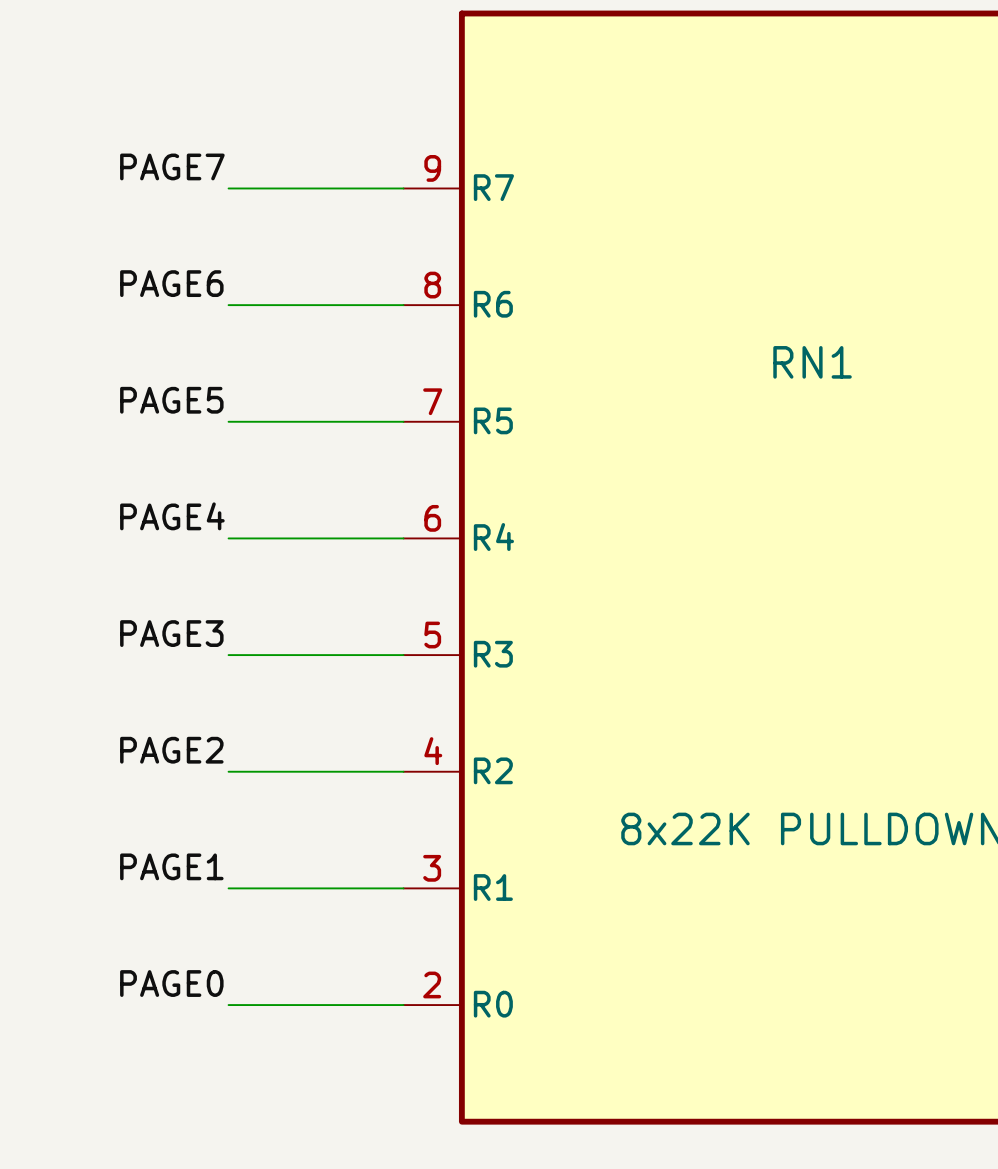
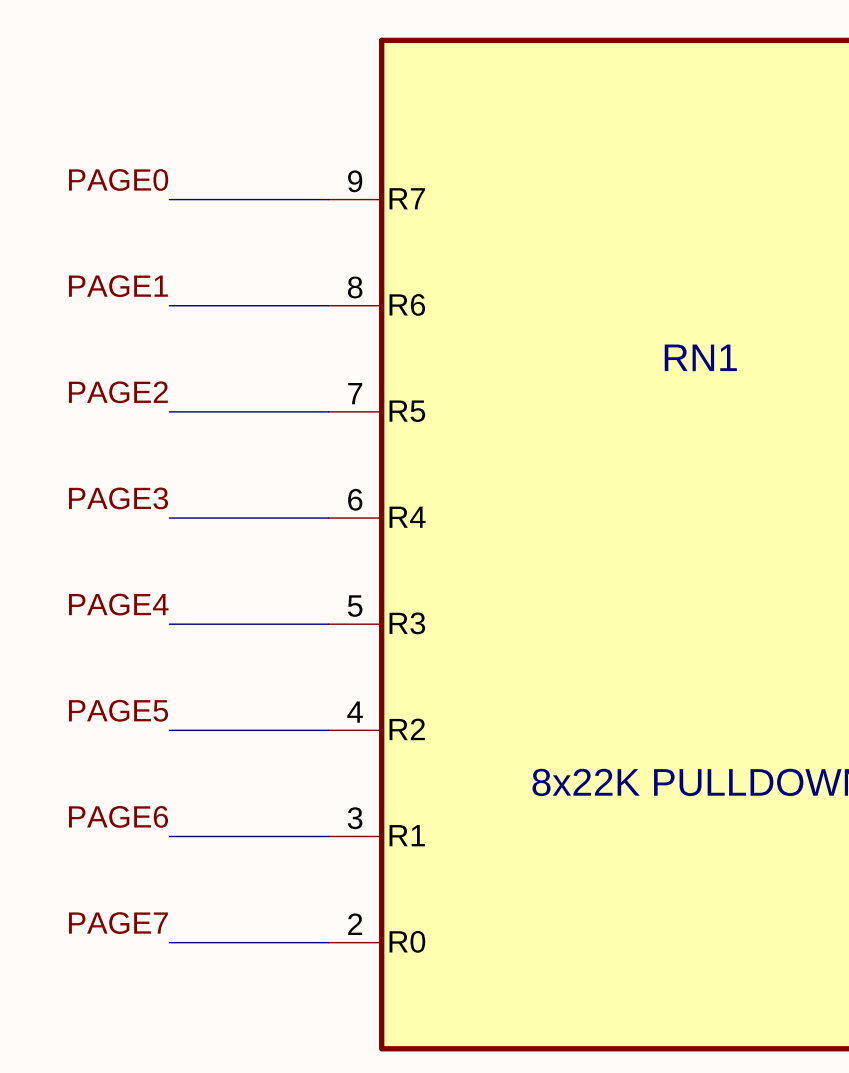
label: PAGE7 (172, 166) -> PAGE0 (118, 179)
label: PAGE6 (171, 283) -> PAGE1 (118, 286)
label: PAGE5 (171, 400) -> PAGE2 (118, 392)
label: PAGE4 (172, 516) -> PAGE3 (118, 498)
label: PAGE3 (171, 633) -> PAGE4 (118, 604)
label: PAGE2 (171, 750) -> PAGE5 (118, 710)
label: PAGE1 (171, 866) -> PAGE6 (118, 816)
label: PAGE0 (171, 983) -> PAGE7 (118, 923)

